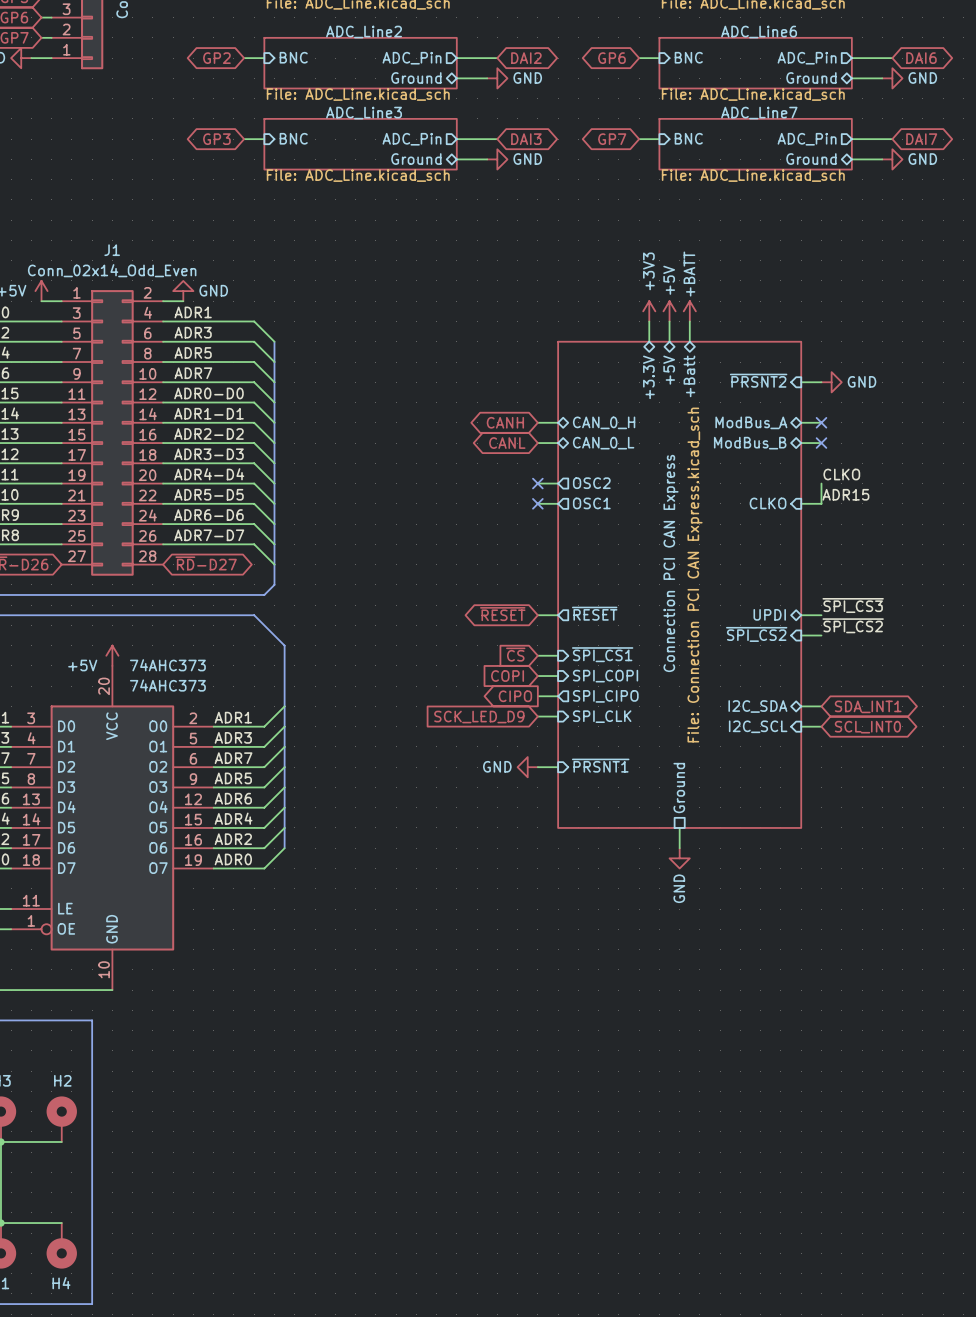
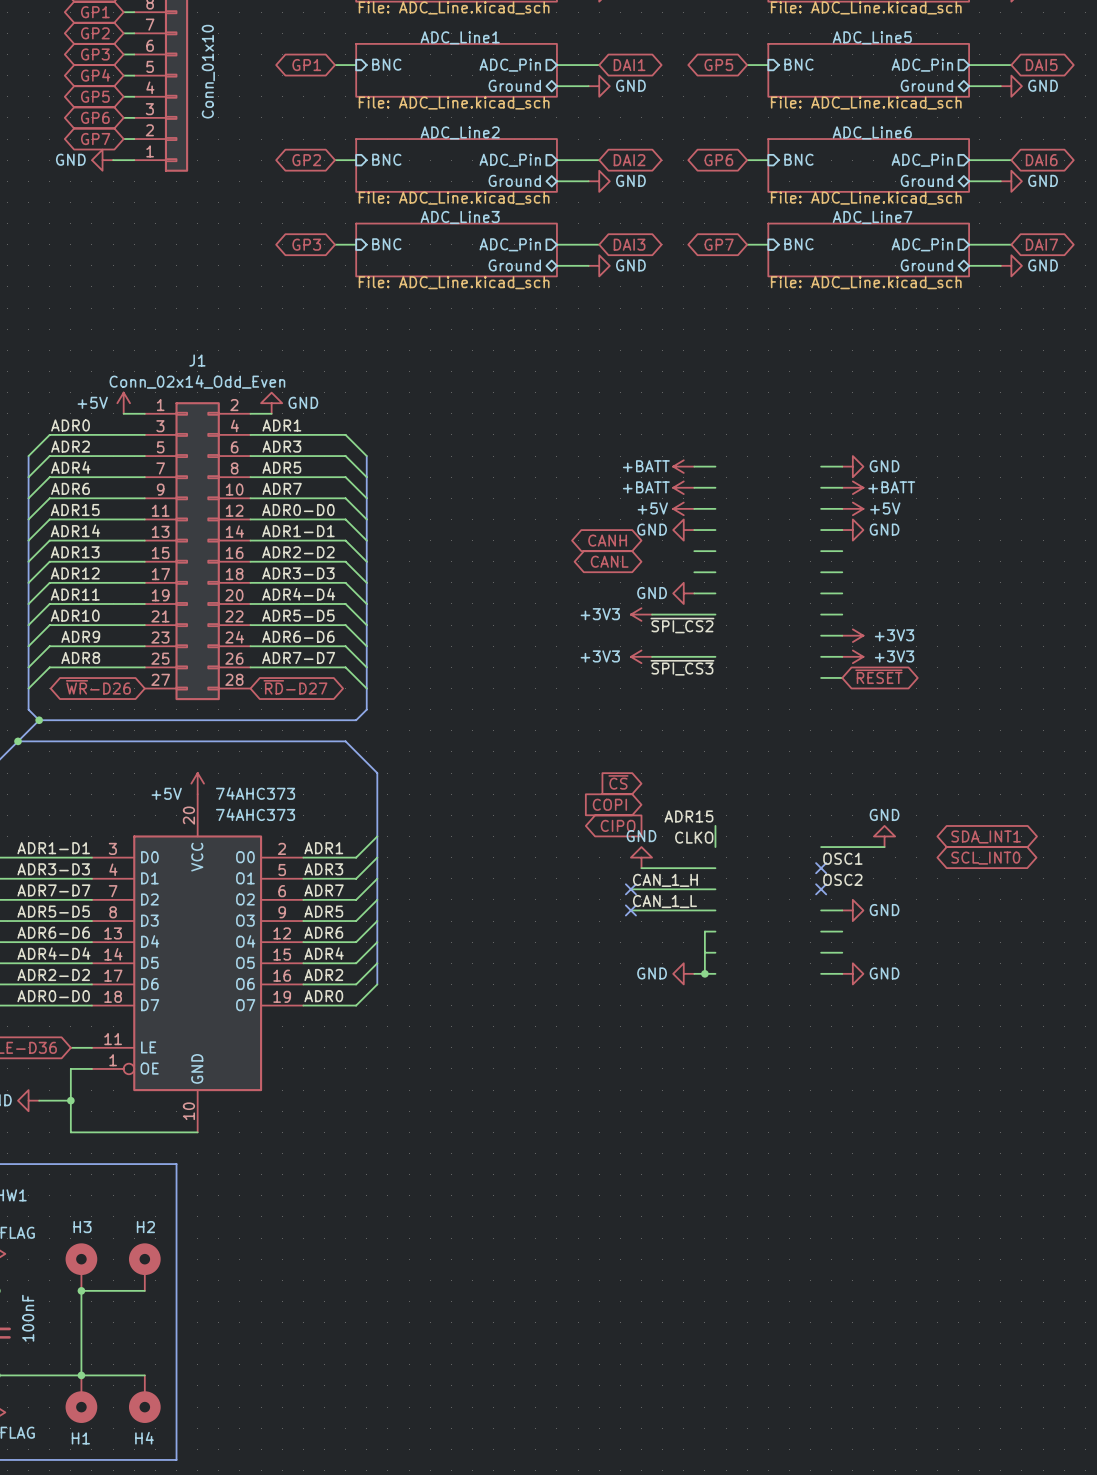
power symbol: +3V3 (649, 311) -> none
power symbol: +5V (669, 311) -> none
power symbol: +BATT (689, 311) -> none
wire: (649, 321) (649, 341) -> none
wire: (669, 321) (669, 341) -> none
wire: (689, 321) (689, 341) -> none
power symbol: none -> +BATT (683, 466)
wire: none -> (694, 466) (715, 466)
wire: none -> (821, 466) (842, 466)
power symbol: none -> GND (852, 466)
sheet pin: +5V (669, 370) -> none
power symbol: none -> +BATT (683, 487)
wire: none -> (694, 487) (715, 487)
wire: none -> (821, 487) (842, 487)
power symbol: none -> +BATT (852, 487)
sheet pin: +Batt (689, 376) -> none
sheet pin: +3.3V (648, 377) -> none
sheet pin: ~{PRSNT2} (758, 380) -> none
wire: (801, 382) (821, 382) -> (821, 572) (842, 572)
power symbol: GND (831, 382) -> none
power symbol: none -> +5V (683, 508)
wire: none -> (694, 508) (715, 508)
wire: none -> (821, 508) (842, 508)
power symbol: none -> +5V (852, 508)
power symbol: none -> GND (683, 530)
wire: none -> (694, 530) (715, 530)
wire: none -> (821, 530) (842, 530)
power symbol: none -> GND (852, 530)
wire: (537, 422) (558, 422) -> (821, 551) (842, 551)
sheet pin: CAN_0_H (604, 422) -> none
sheet pin: ModBus_A (751, 422) -> none
wire: (801, 422) (821, 422) -> (821, 614) (842, 614)
no-connect mark: (821, 422) -> none
wire: (537, 443) (558, 443) -> (821, 593) (842, 593)
sheet pin: CAN_0_L (603, 443) -> none
sheet pin: ModBus_B (750, 443) -> none
wire: (801, 443) (821, 443) -> (821, 635) (842, 635)
no-connect mark: (821, 443) -> none
power symbol: none -> GND (683, 593)
label: CLKO (841, 474) -> none
wire: (537, 483) (558, 483) -> (694, 572) (715, 572)
no-connect mark: (537, 483) -> none
sheet pin: OSC2 (591, 483) -> none
wire: (821, 483) (821, 503) (801, 503) -> none
power symbol: none -> +3V3 (641, 614)
wire: none -> (652, 614) (715, 614)
label: ADR15 (845, 494) -> none
wire: (537, 503) (558, 503) -> (821, 656) (842, 656)
no-connect mark: (537, 503) -> none
sheet pin: OSC1 (591, 503) -> none
sheet pin: CLKO (768, 503) -> none
label: none -> ~{SPI_CS2} (682, 625)
power symbol: none -> +3V3 (852, 635)
power symbol: none -> +3V3 (641, 656)
wire: none -> (652, 656) (715, 656)
power symbol: none -> +3V3 (852, 656)
label: none -> ~{SPI_CS3} (682, 667)
global label: none -> ~{RESET} (878, 676)
sheet Connection PCI CAN Express: File: Connection PCI CAN Express.kicad_sch (679, 584) -> none
label: ~{SPI_CS3} (853, 605) -> none
sheet pin: ~{RESET} (594, 613) -> none
global label: ~{RESET} (502, 614) -> none
sheet pin: UPDI (769, 614) -> none
wire: (537, 615) (558, 615) -> (694, 551) (715, 551)
wire: (801, 615) (821, 615) -> none
label: ~{SPI_CS2} (853, 625) -> none
sheet pin: ~{SPI_CS2} (756, 634) -> none
wire: (801, 635) (821, 635) -> (821, 677) (842, 677)
sheet pin: ~{SPI_CS1} (602, 654) -> none
wire: (537, 655) (558, 655) -> (694, 593) (715, 593)
wire: (537, 676) (558, 676) -> none
sheet pin: SPI_COPI (605, 676) -> none
label: none -> ADR15 (688, 816)
wire: (537, 696) (558, 696) -> none
sheet pin: SPI_CIPO (605, 696) -> none
sheet pin: I2C_SDA (757, 706) -> none
power symbol: none -> GND (884, 836)
wire: (801, 706) (821, 706) -> (821, 910) (842, 910)
label: none -> CLKO (694, 837)
wire: (537, 716) (558, 716) -> (694, 973) (715, 973)
sheet pin: SPI_CLK (602, 716) -> none
wire: none -> (821, 847) (884, 847)
global label: SCK_LED_D9 (479, 717) -> none
sheet pin: I2C_SCL (758, 726) -> none
wire: (801, 726) (821, 726) -> (821, 931) (842, 931)
label: none -> OSC1 (842, 858)
wire: none -> (641, 868) (715, 868)
no-connect mark: none -> (821, 868)
label: none -> CAN_1_H (665, 880)
label: none -> OSC2 (842, 879)
wire: none -> (630, 889) (715, 889)
no-connect mark: none -> (630, 889)
no-connect mark: none -> (821, 889)
sheet pin: ~{PRSNT1} (600, 765) -> none
power symbol rotation: 0° (527, 767) -> 90° clockwise (641, 857)
power symbol position: GND (527, 767) -> GND (641, 857)
wire: (537, 767) (558, 767) -> (821, 952) (842, 952)
label: none -> CAN_1_L (664, 901)
wire: none -> (630, 910) (715, 910)
no-connect mark: none -> (630, 910)
power symbol: none -> GND (852, 910)
sheet pin: Ground (679, 788) -> none
wire: none -> (715, 931) (704, 931) (704, 973)
wire: none -> (704, 952) (715, 952)
wire: (679, 827) (679, 848) -> (715, 825) (715, 847)
power symbol: none -> GND (683, 973)
junction: none -> (704, 973)
wire: none -> (821, 973) (842, 973)
power symbol: none -> GND (852, 973)
power symbol: GND (679, 858) -> none

